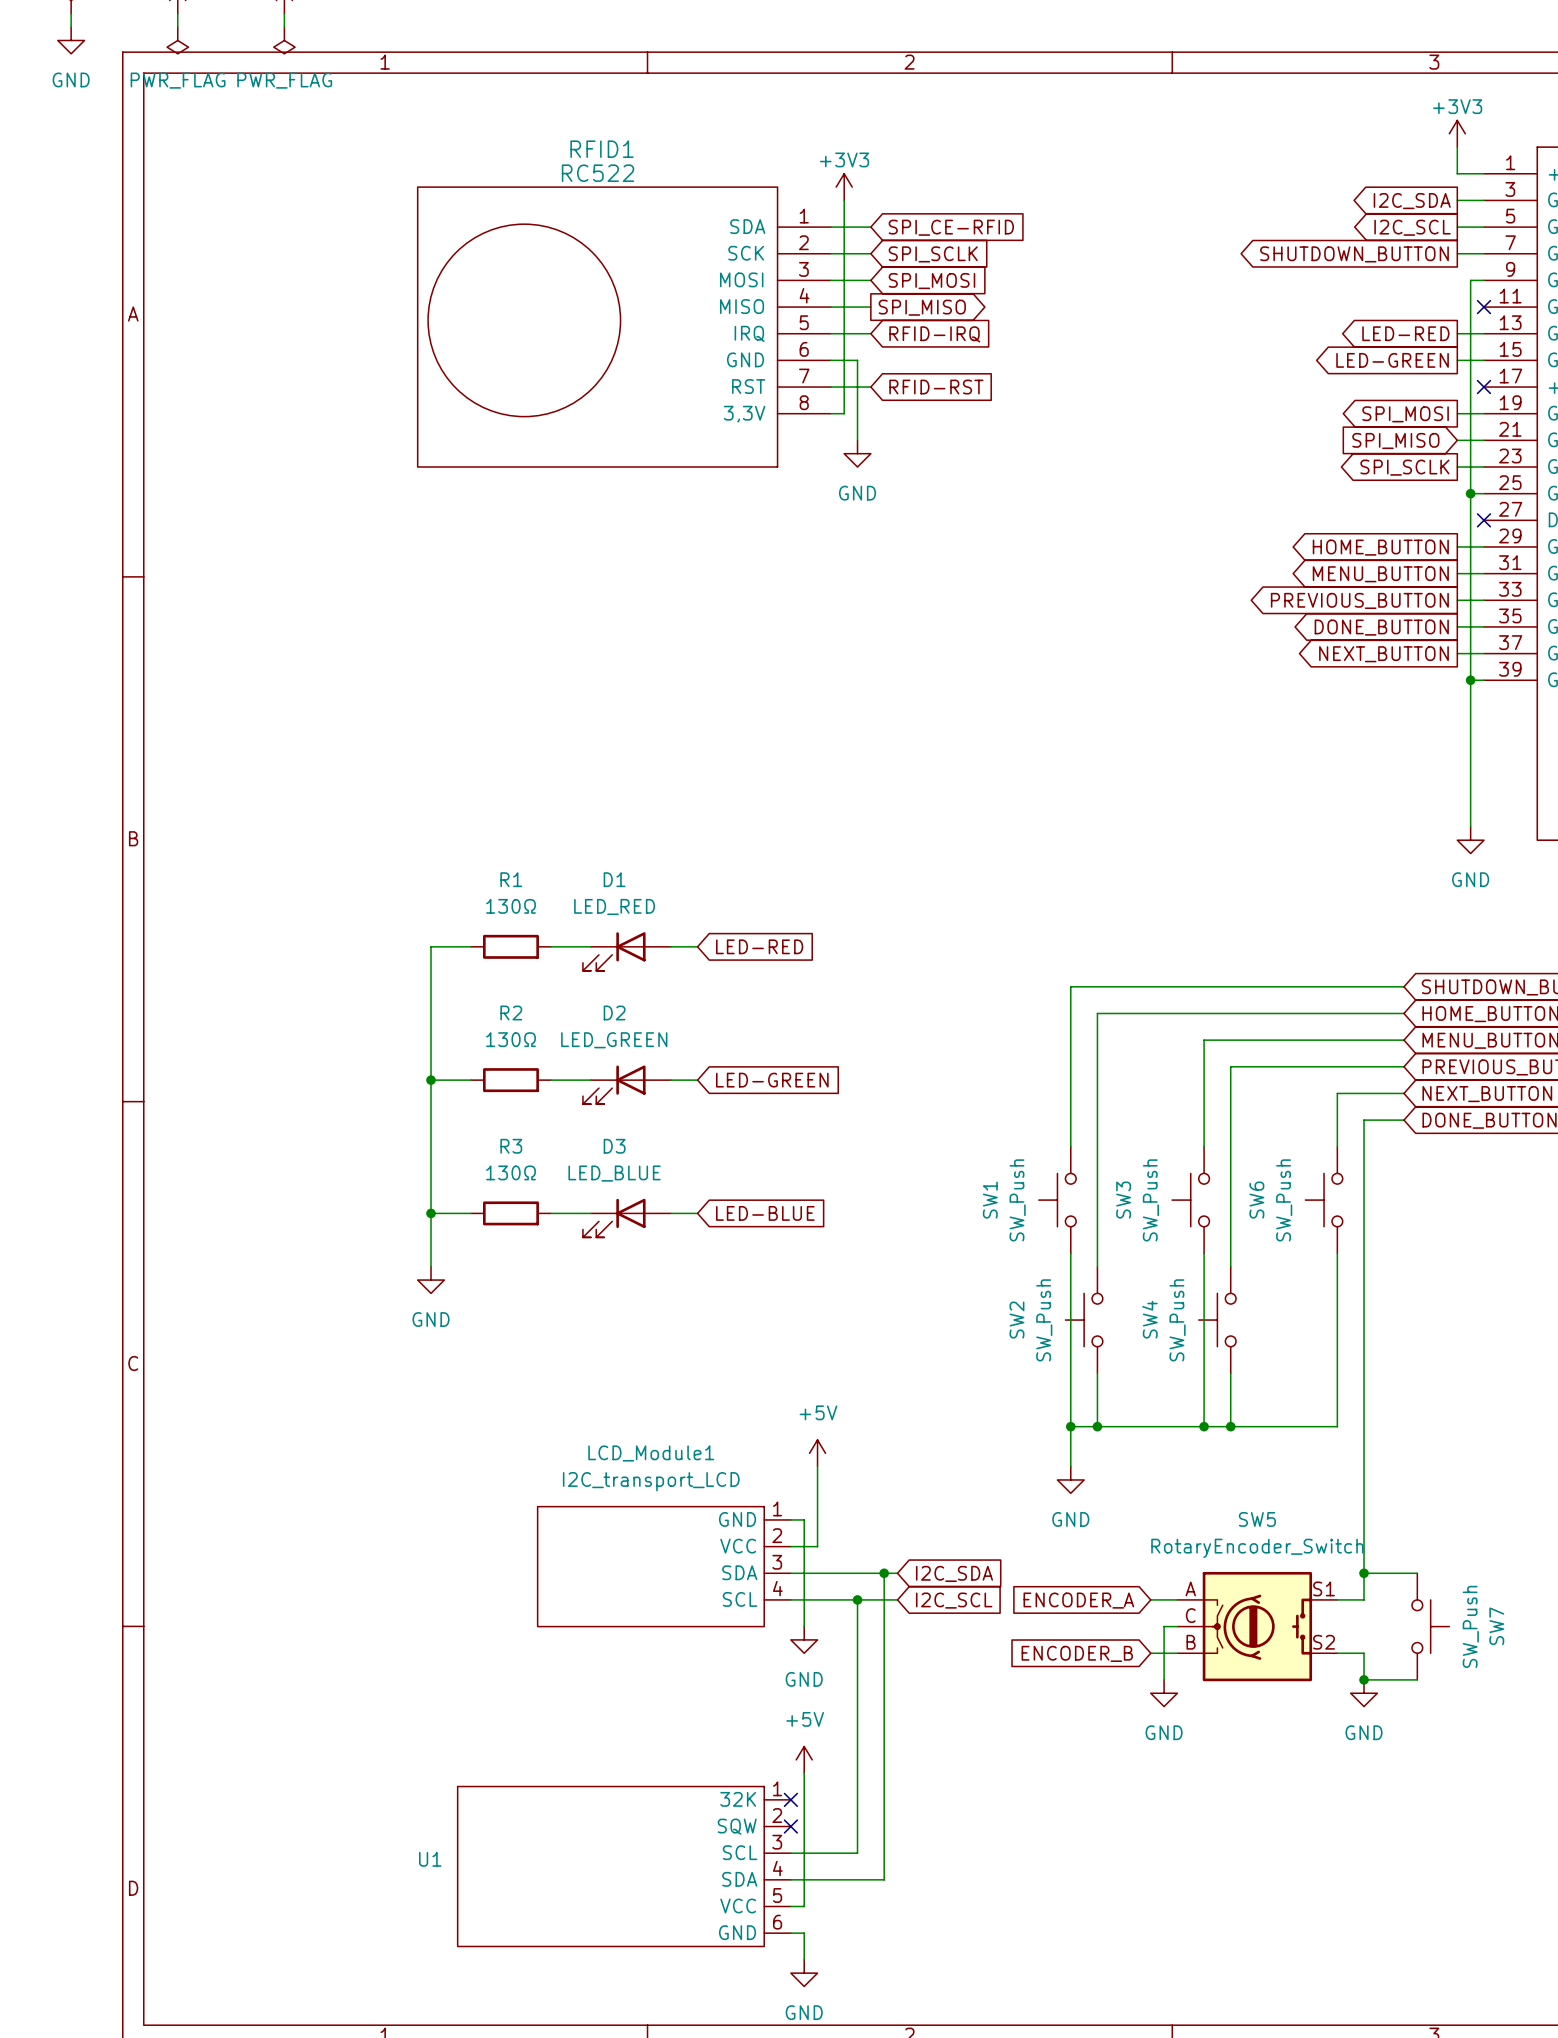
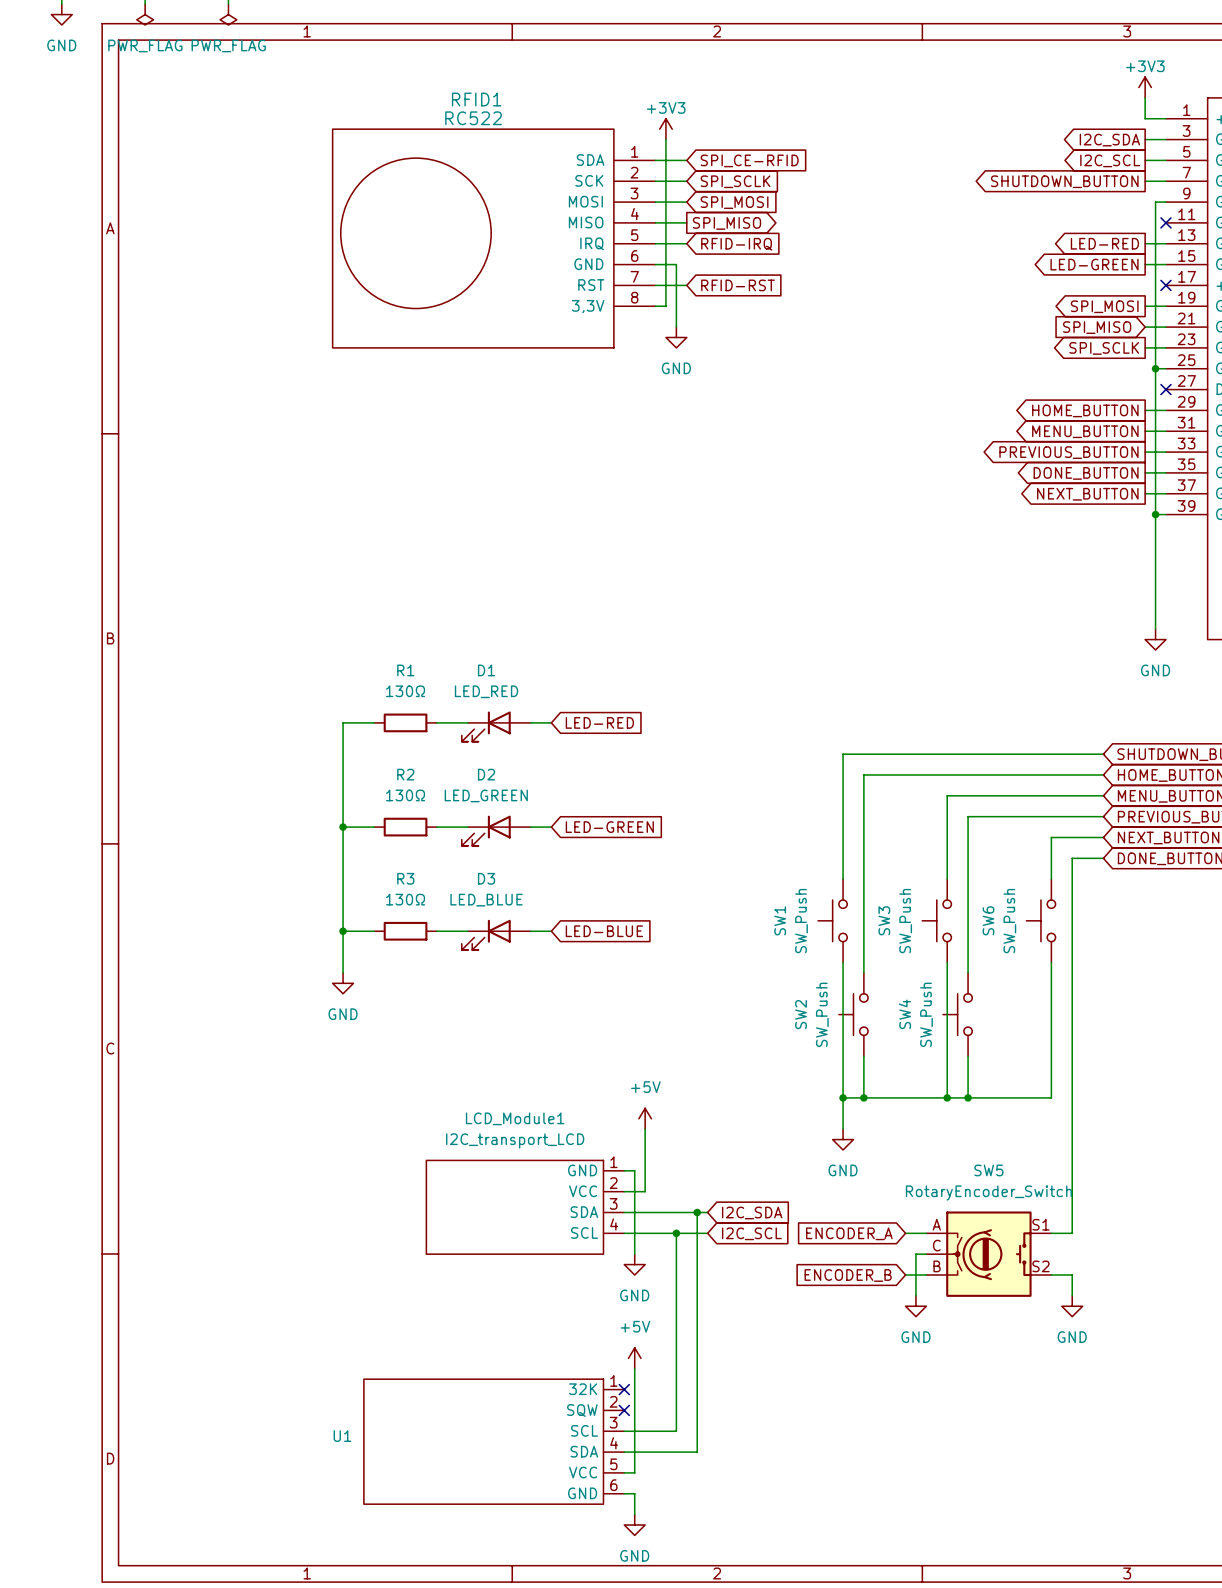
wire: (1364, 1573) (1417, 1573) -> none
junction: (1364, 1573) -> none
SW7: SW_Push (1430, 1626) -> none
wire: (1364, 1679) (1417, 1679) -> none
junction: (1364, 1679) -> none

